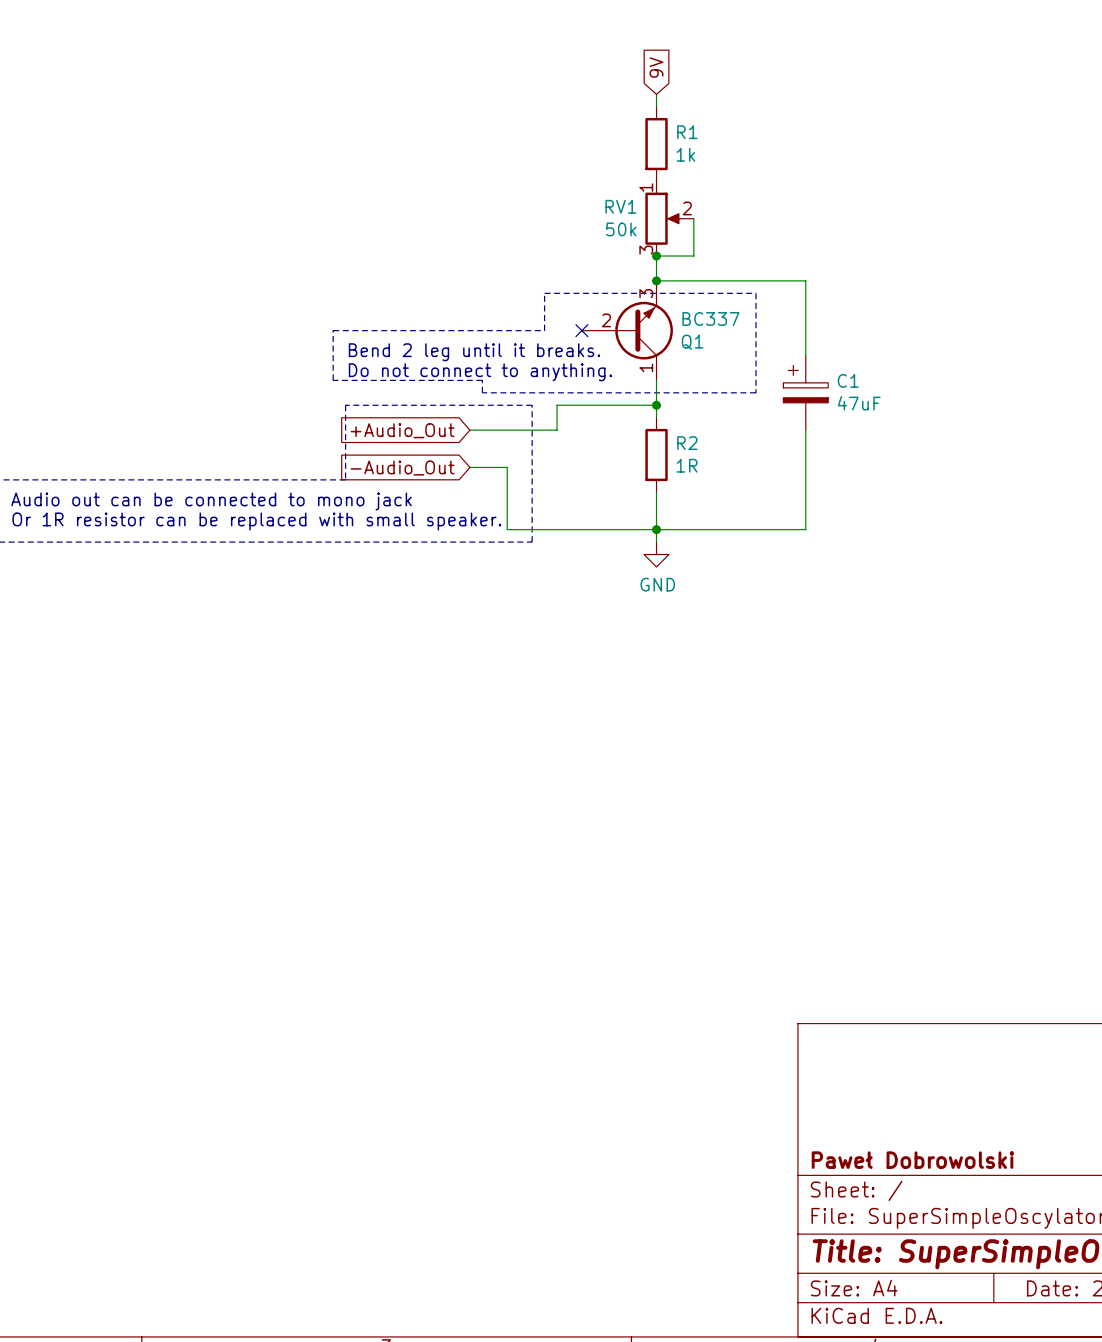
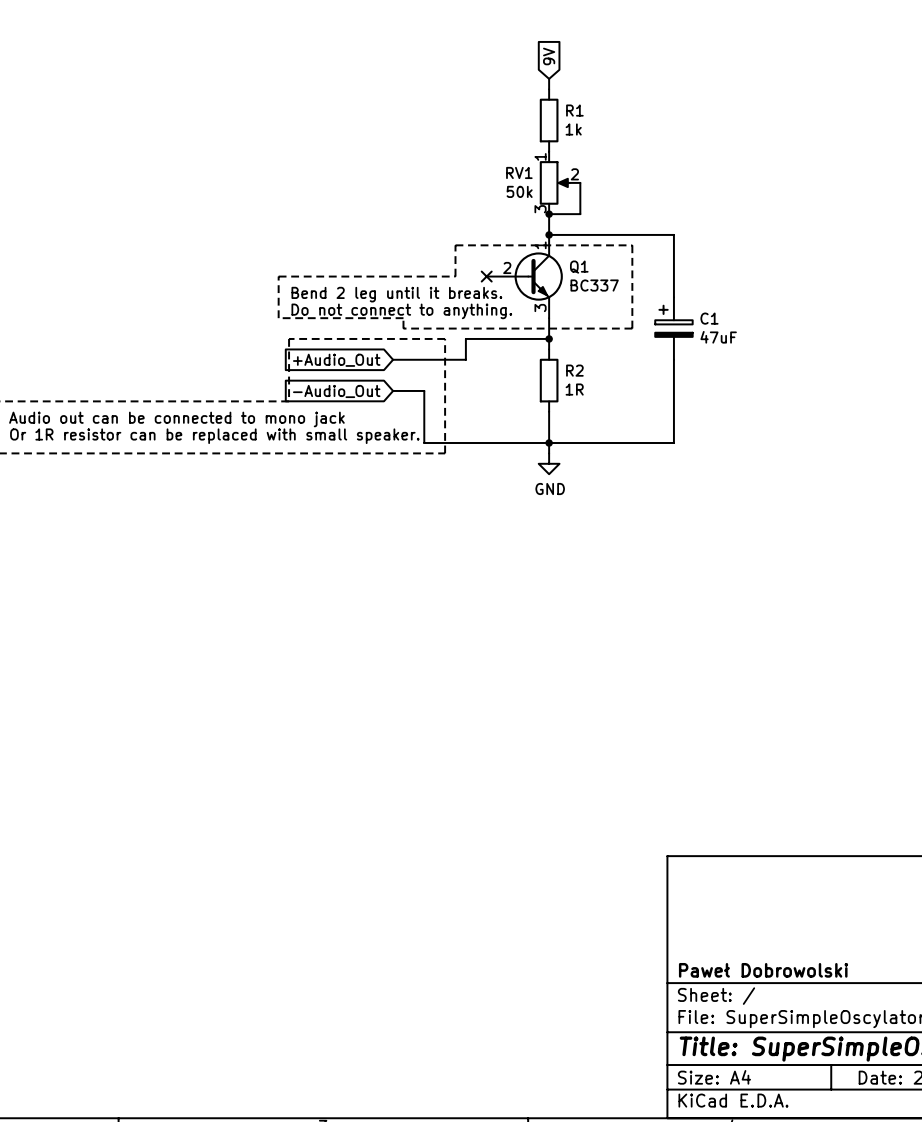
Q1 flip: as is (644, 330) -> up-down (538, 276)

